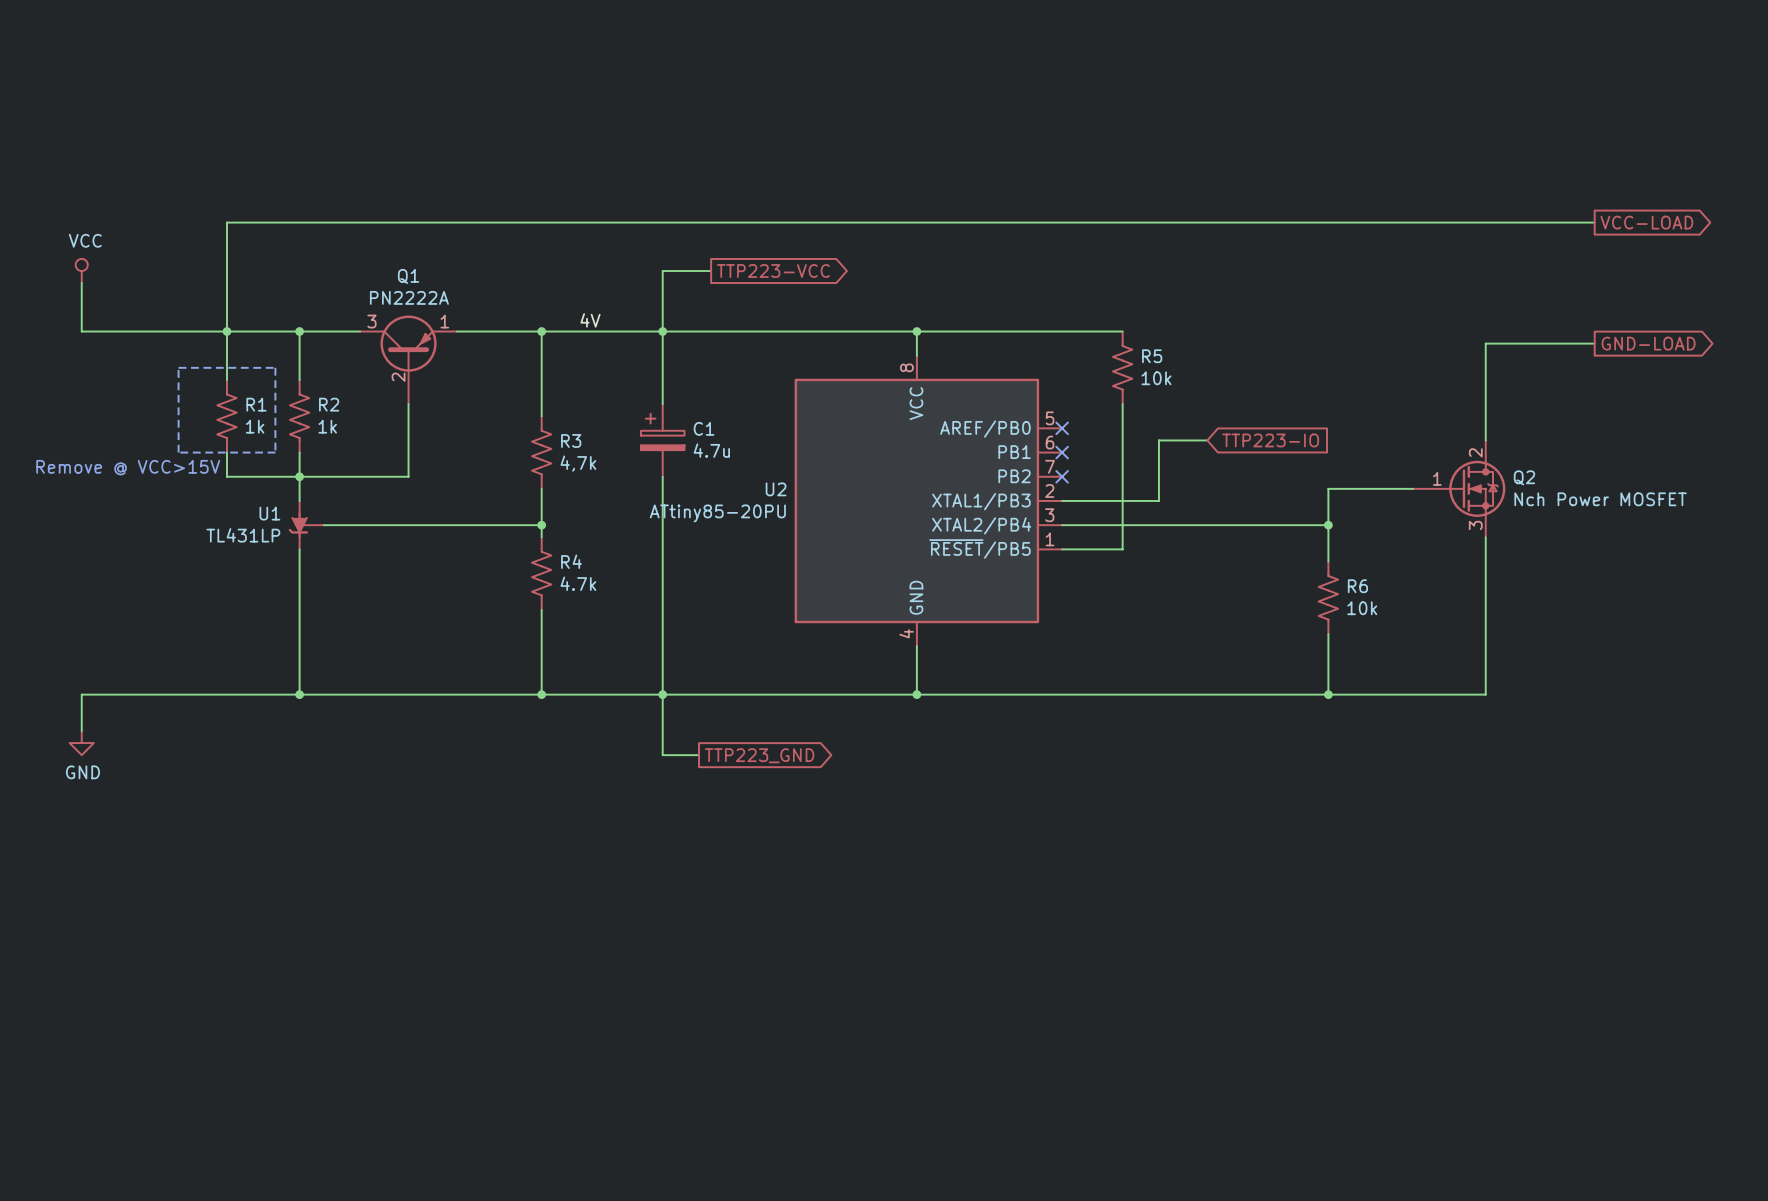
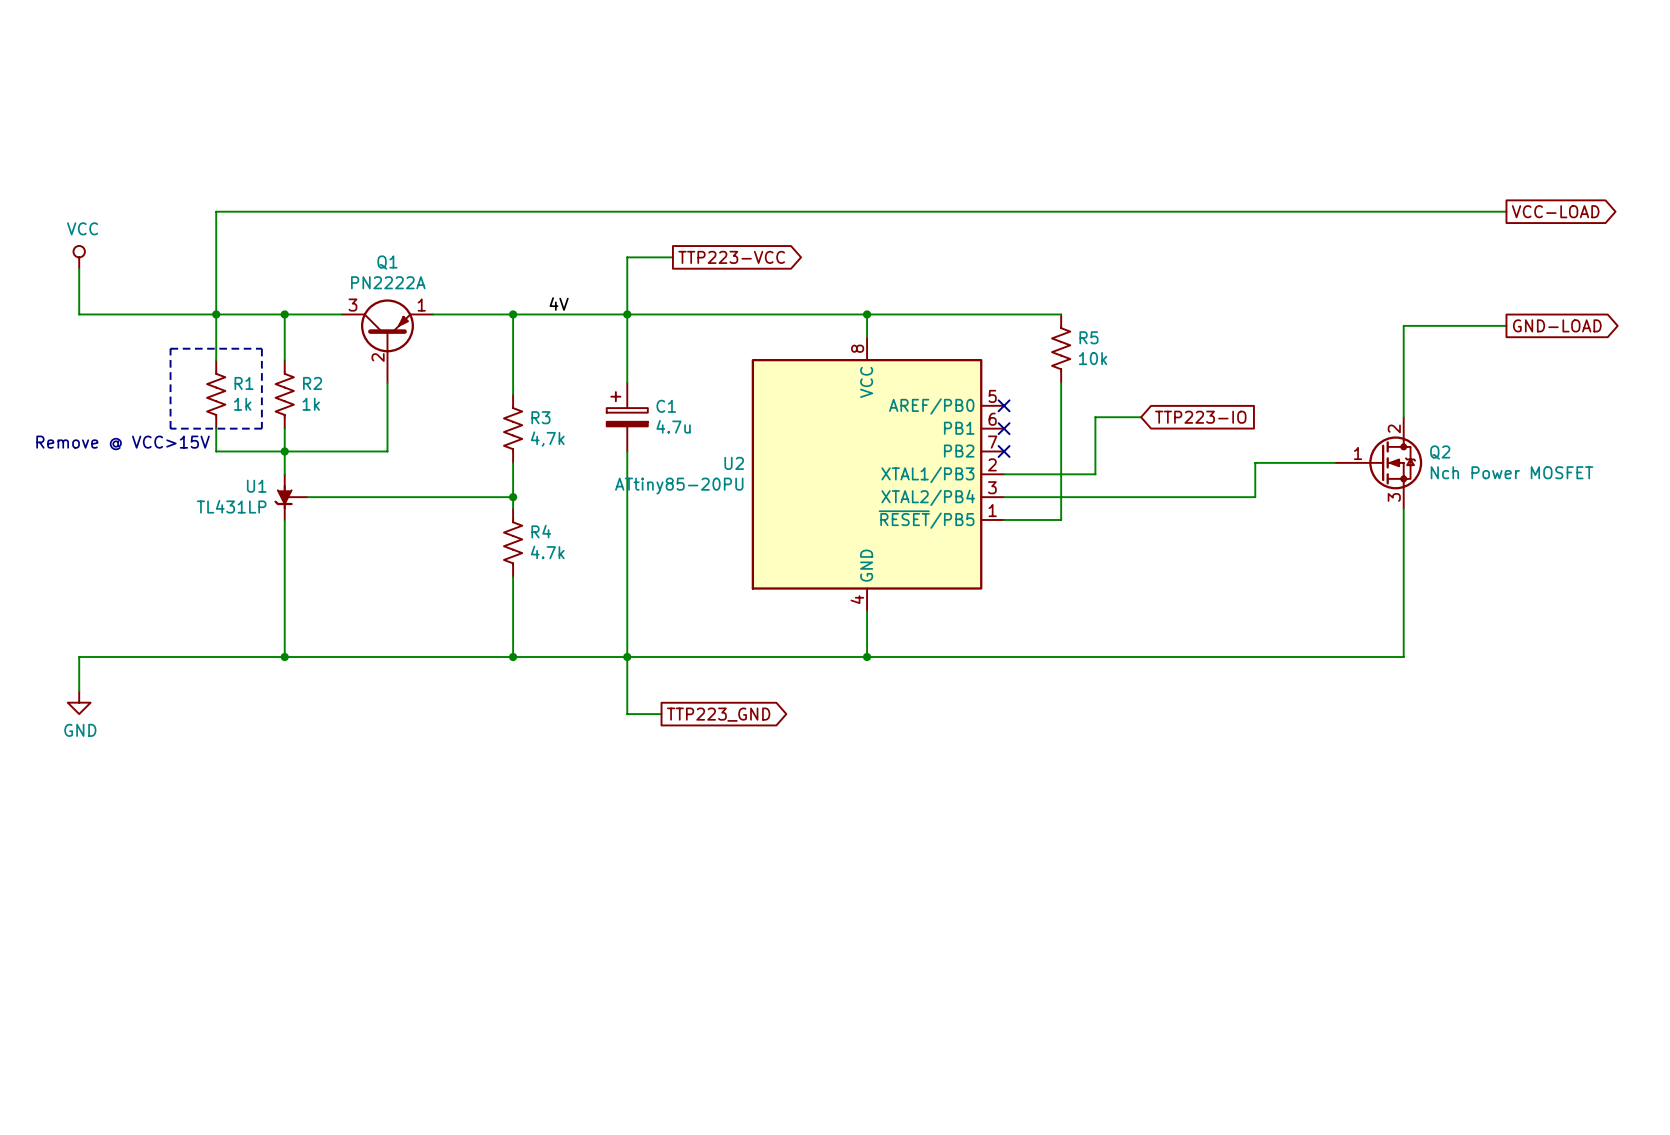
wire: (1328, 525) (1328, 561) -> none
junction: (1328, 525) -> none
R6: 10k (1328, 597) -> none
wire: (1328, 634) (1328, 694) -> none
junction: (1328, 694) -> none

